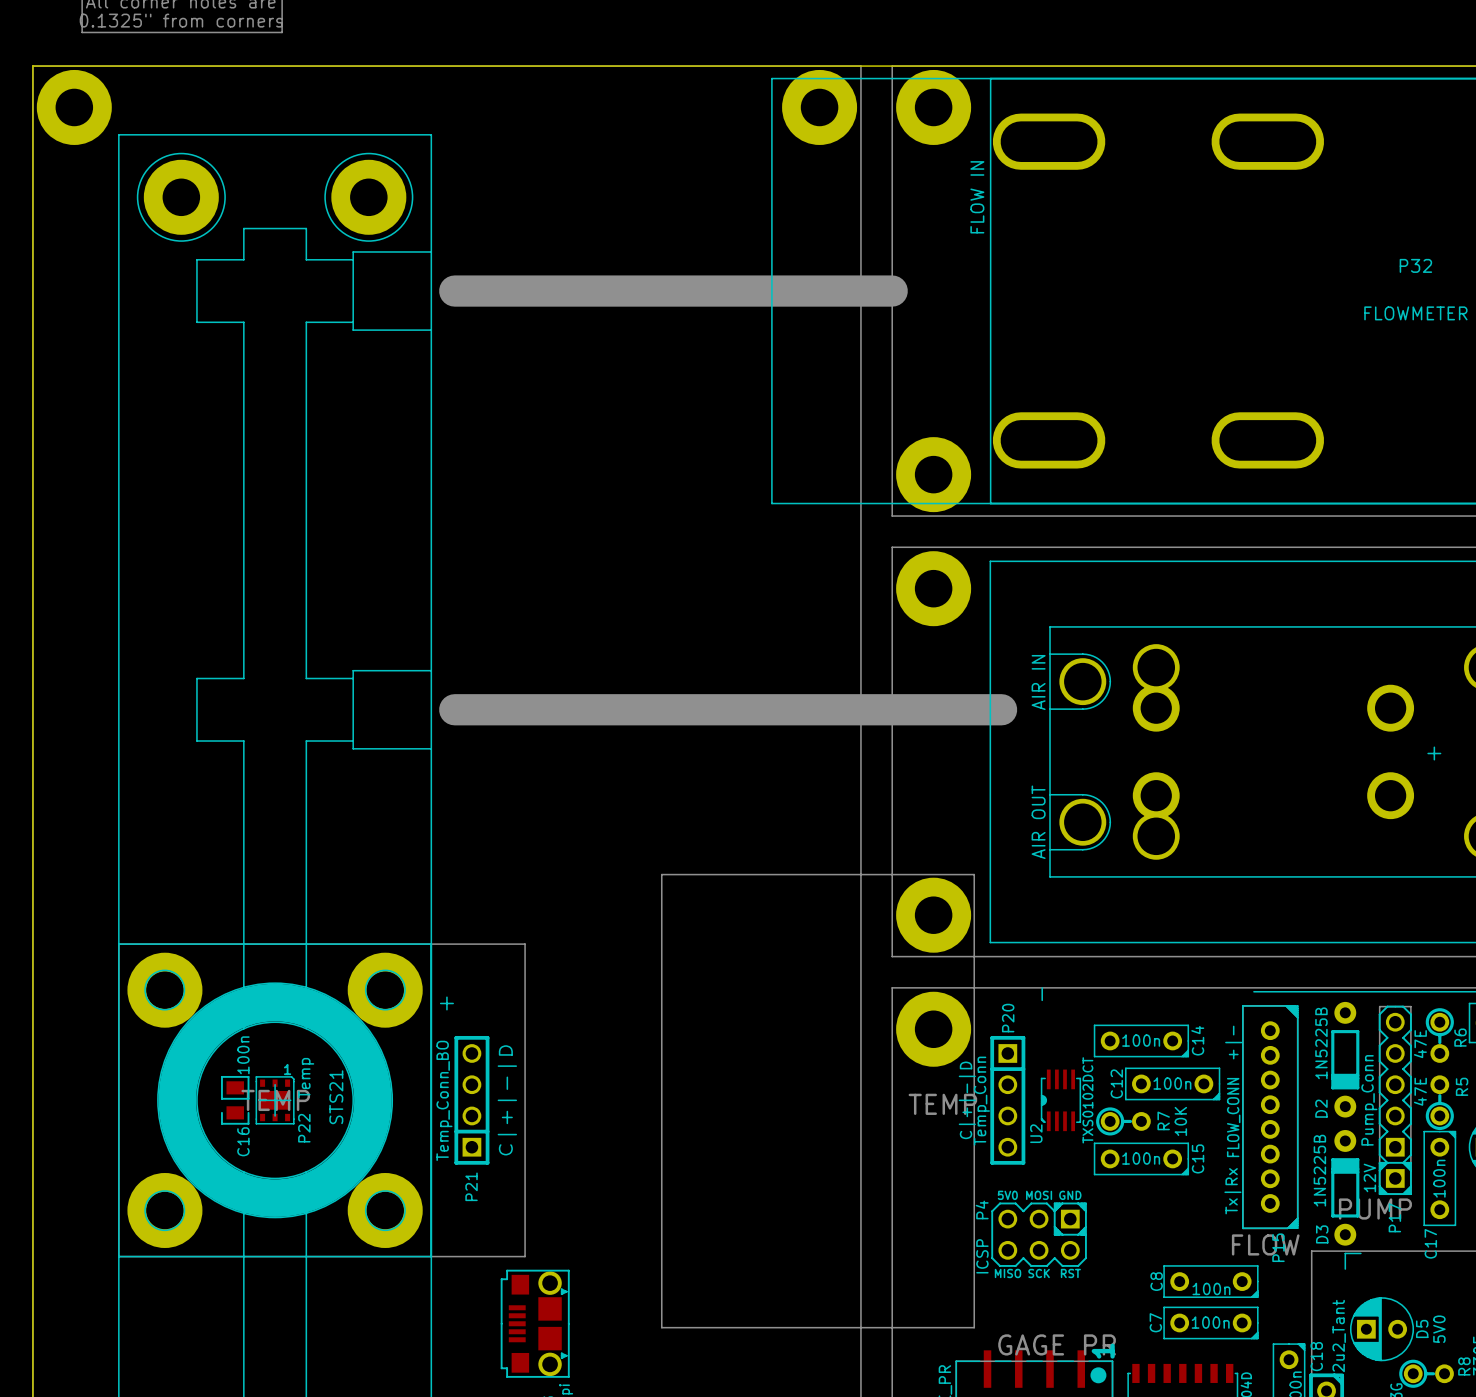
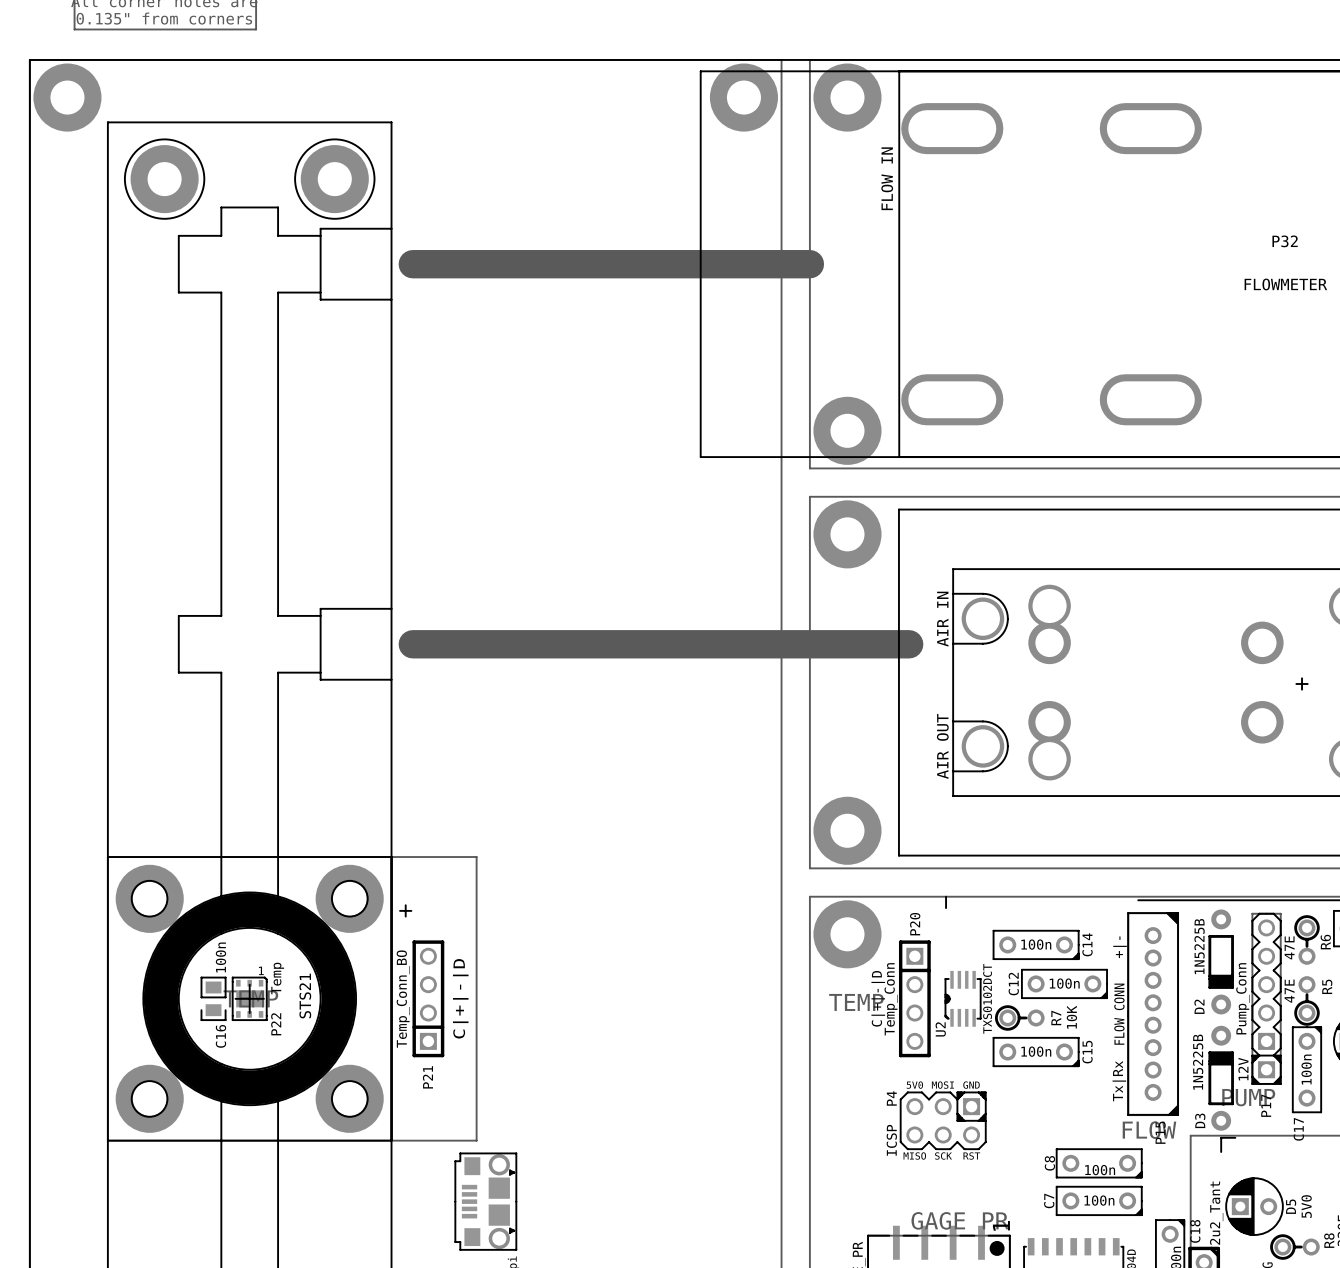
text: 0.1325" from corners (181, 20) -> 0.135" from corners (164, 18)
line: (661, 874) (661, 1327) (974, 1327) (974, 874) (661, 874) -> none

